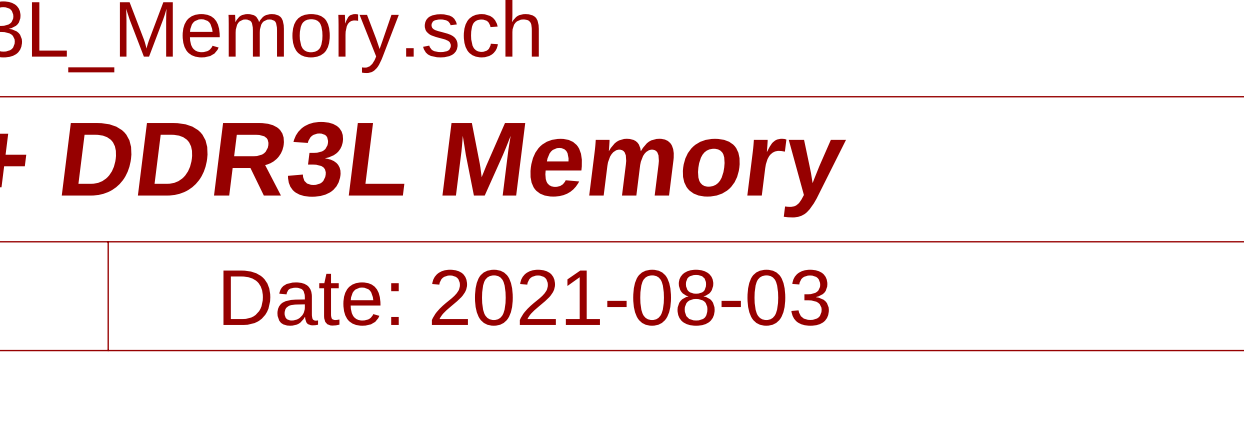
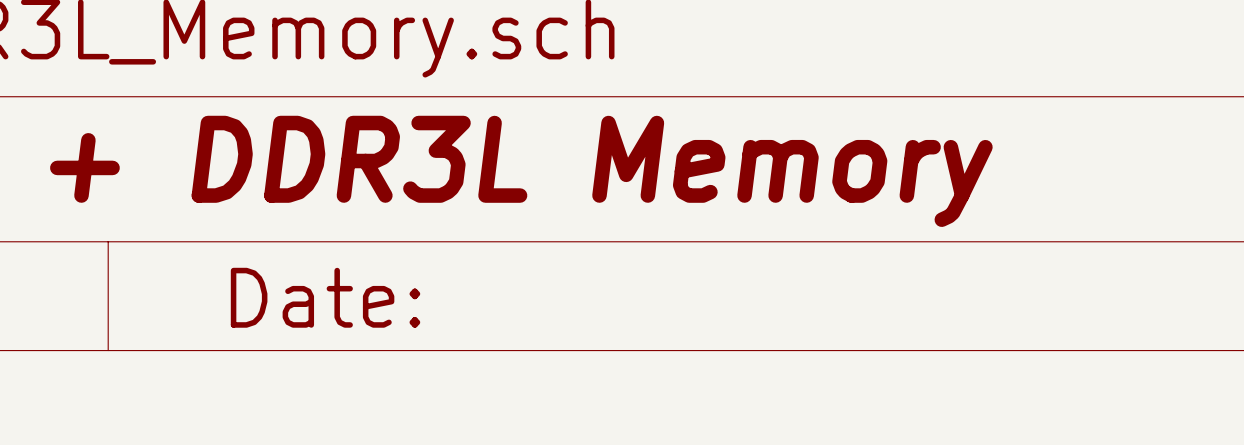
title block: Date: 2021-08-03 (526, 297) -> Date: (325, 297)

